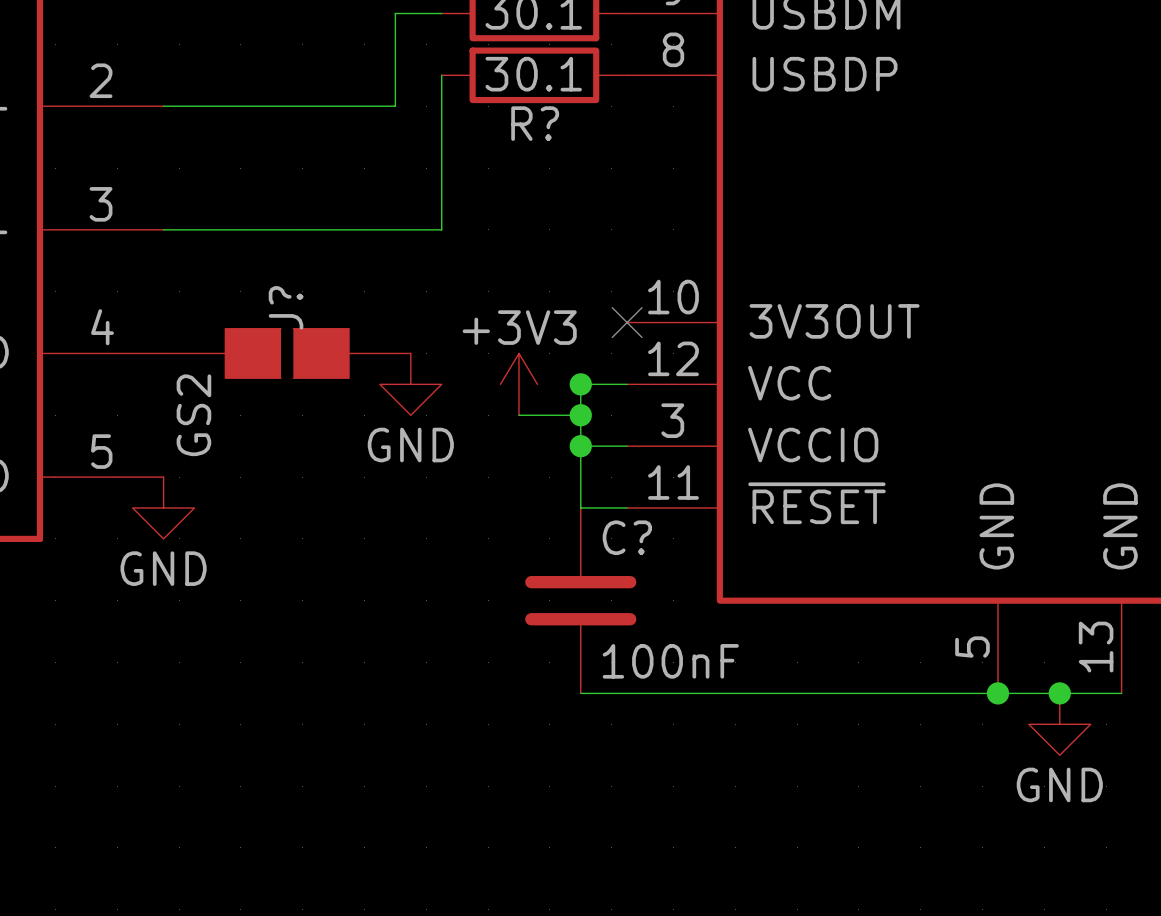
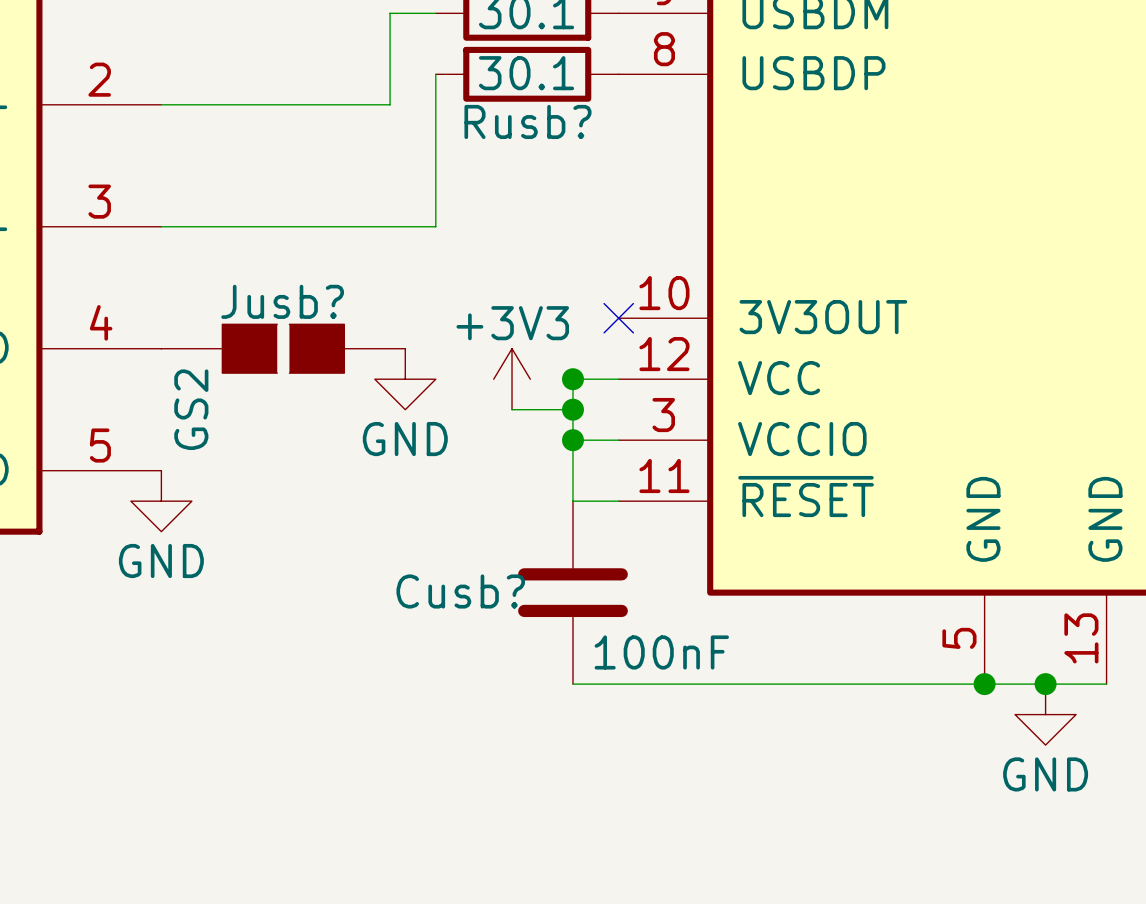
R? name: R? (535, 123) -> Rusb? (527, 121)
J? name: J? (286, 307) -> Jusb? (282, 301)
C? name: C? (627, 537) -> Cusb? (460, 591)

